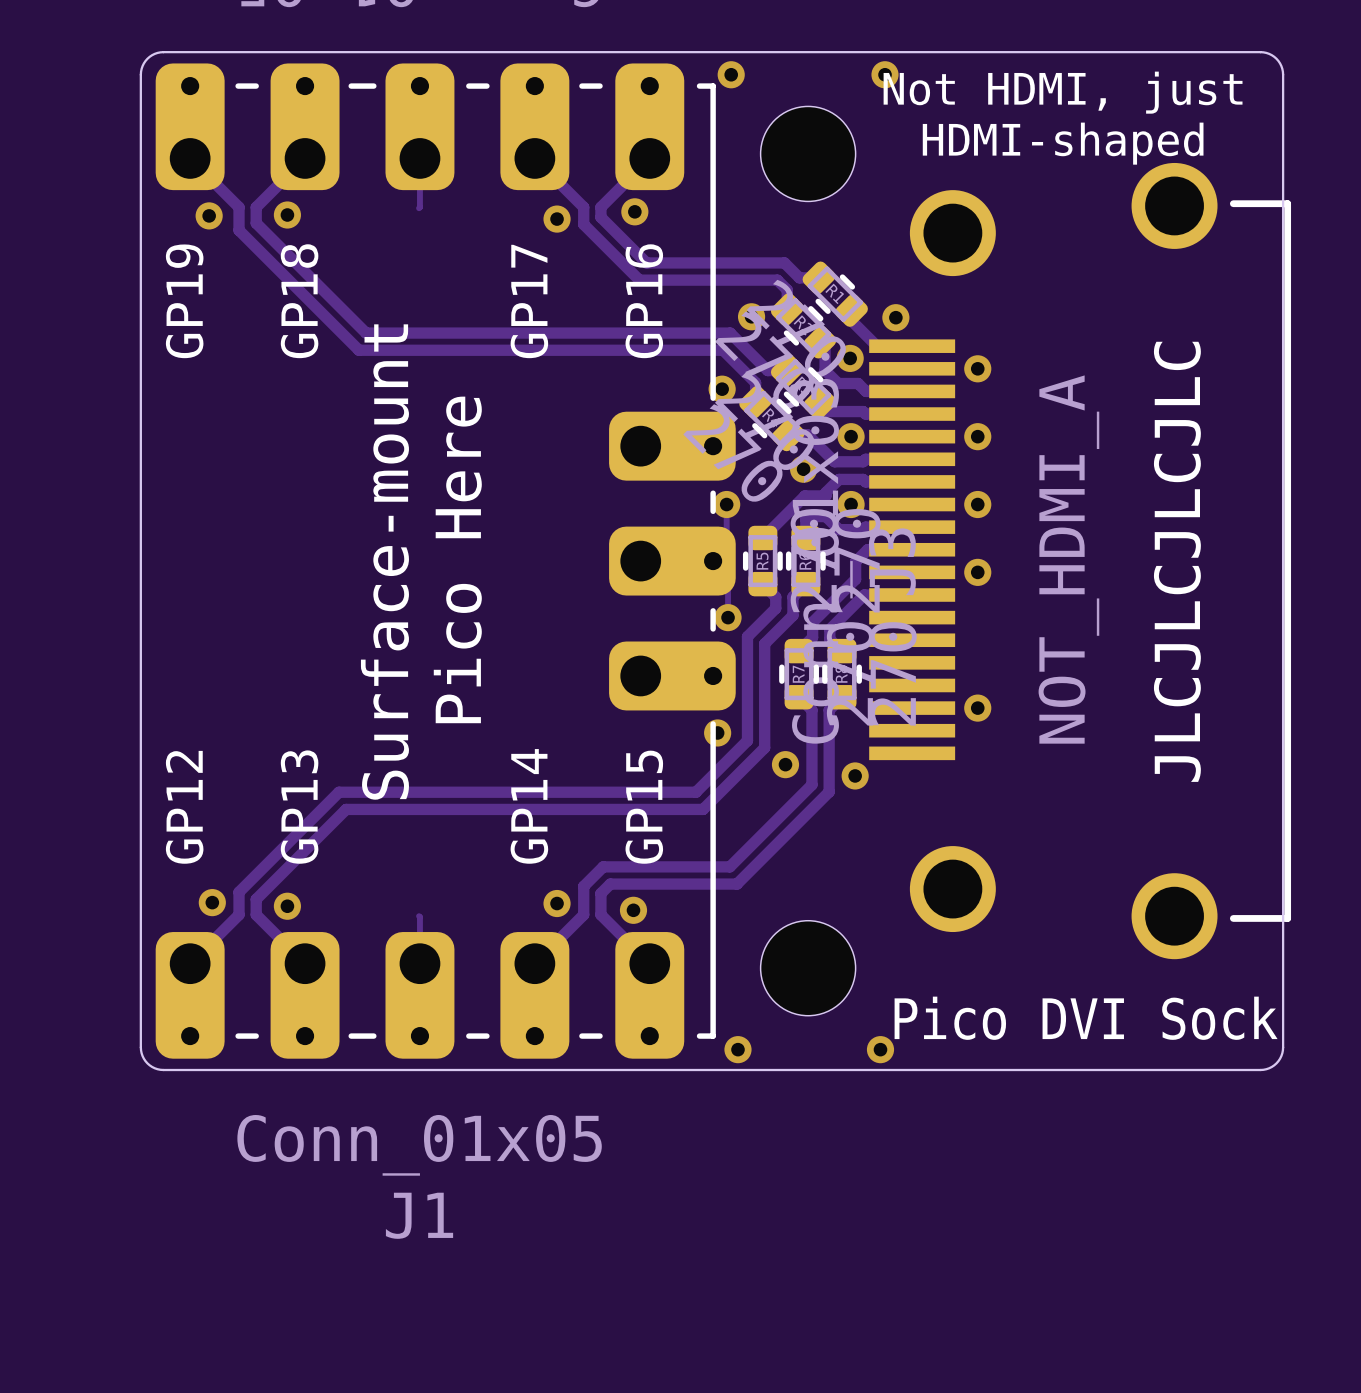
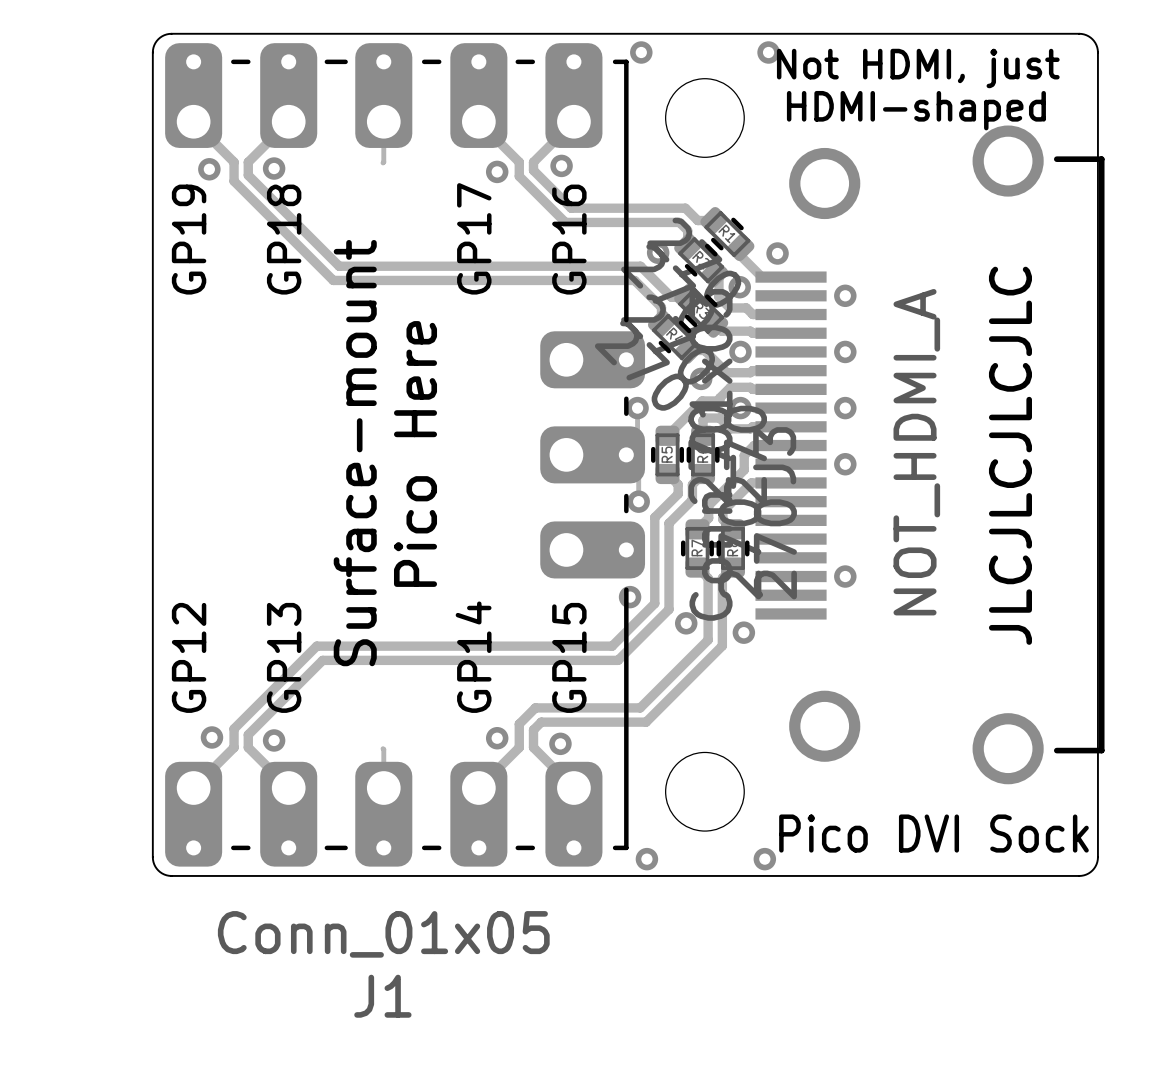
via: (722, 389) -> none

